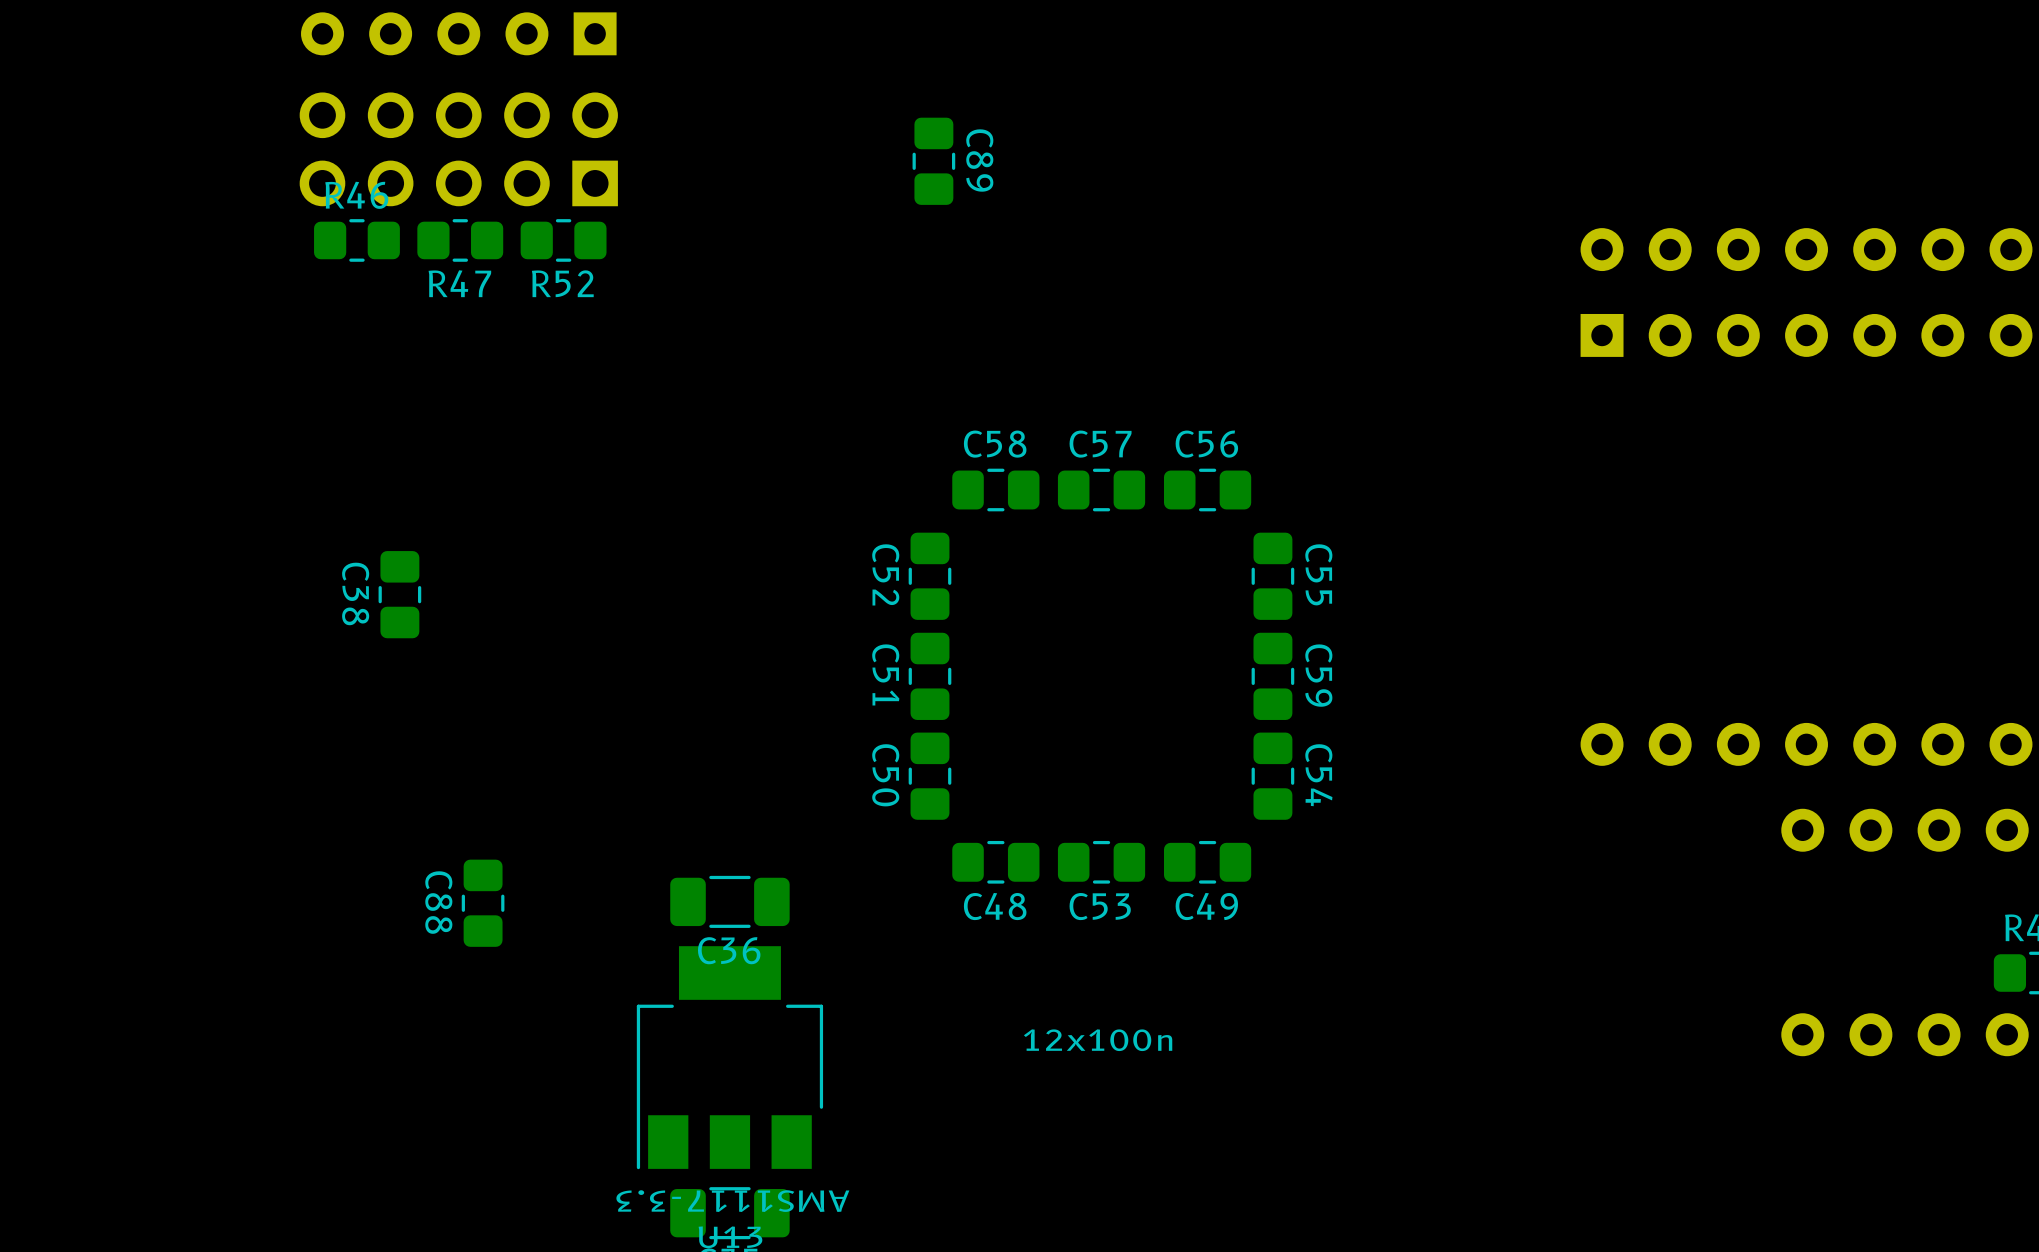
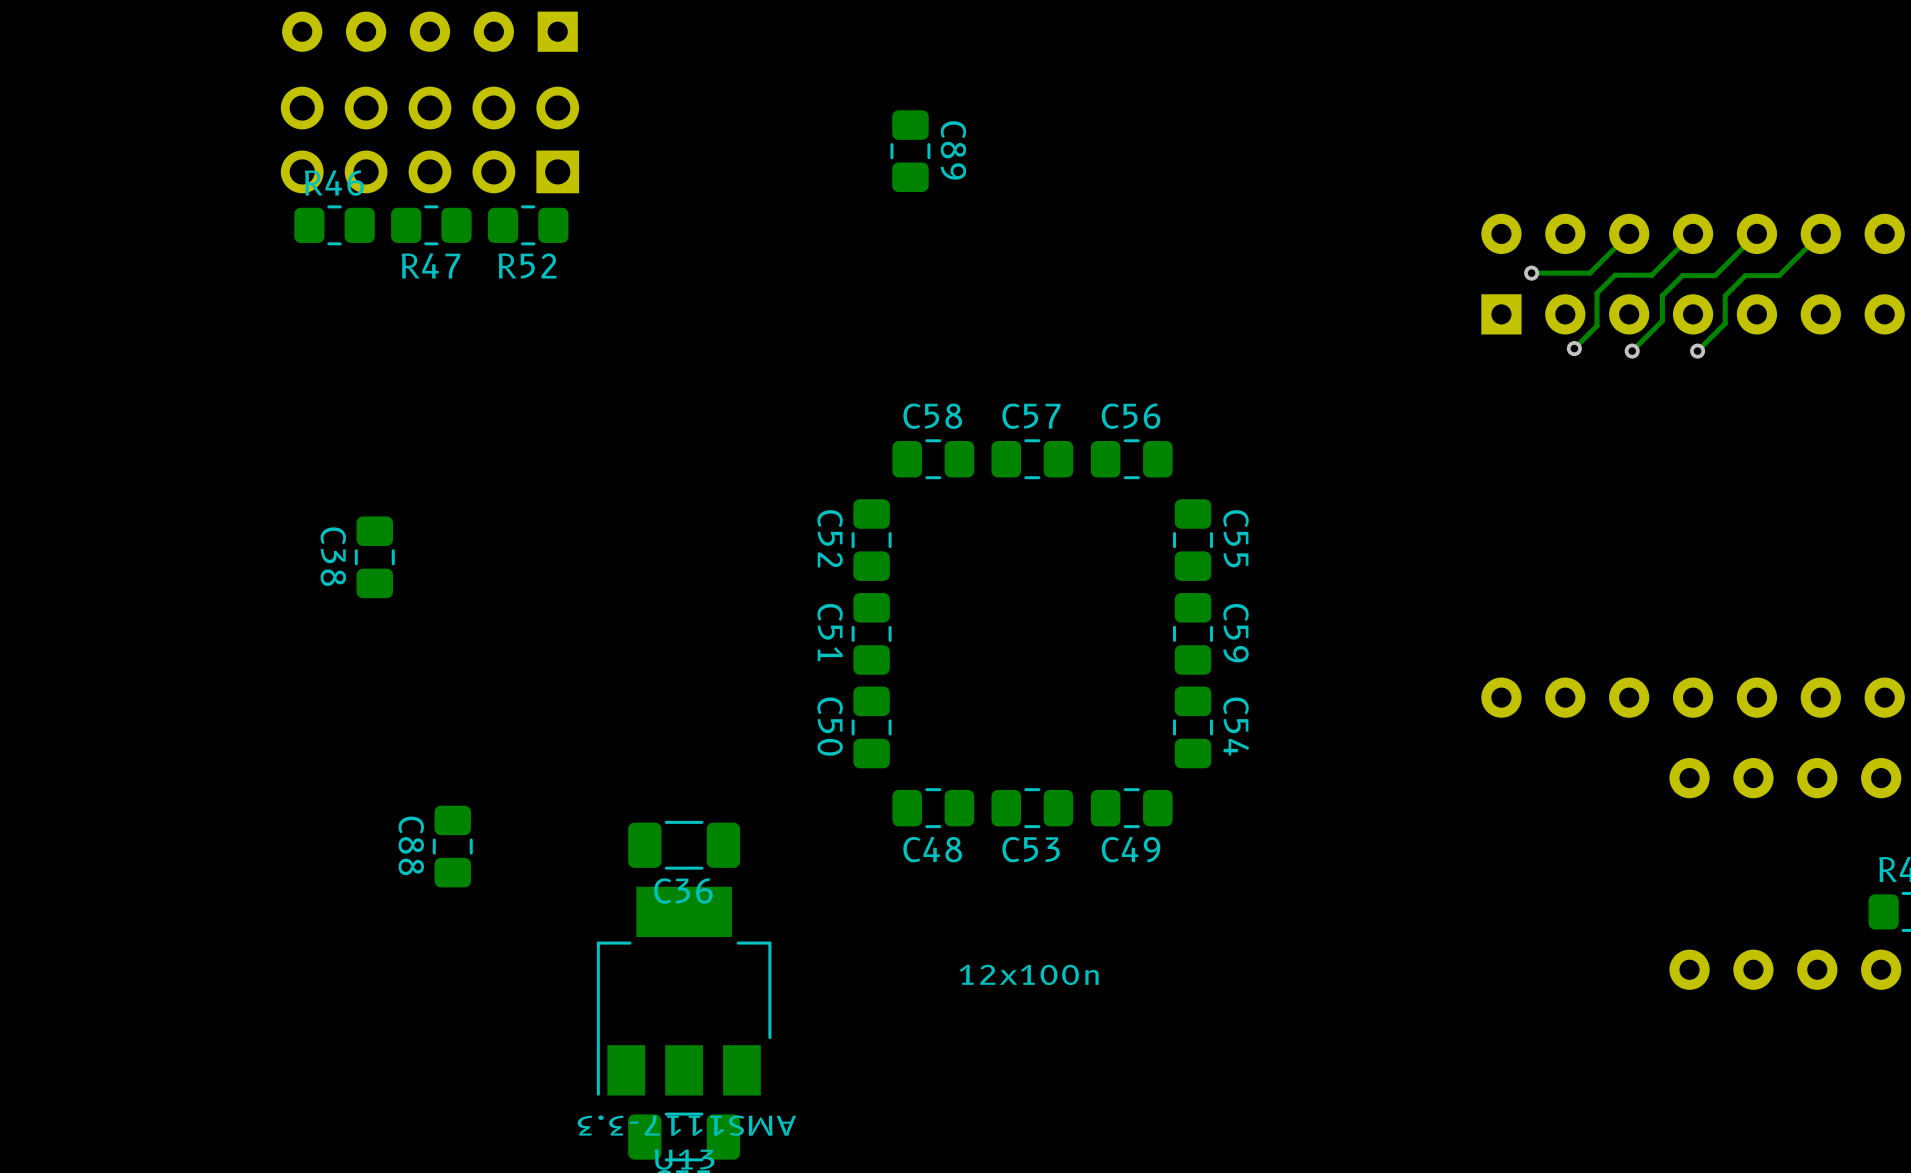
C89 position: (933, 161) -> (910, 151)
track: none -> (1629, 233) (1589, 273) (1531, 273)
track: none -> (1693, 233) (1651, 275) (1615, 275) (1597, 293) (1597, 325) (1574, 348)
track: none -> (1756, 233) (1715, 275) (1682, 275) (1662, 295) (1662, 320) (1632, 351)
track: none -> (1820, 233) (1779, 275) (1745, 275) (1725, 295) (1725, 323) (1697, 351)
via: none -> (1531, 273)
via: none -> (1574, 348)
via: none -> (1632, 351)
via: none -> (1697, 351)

